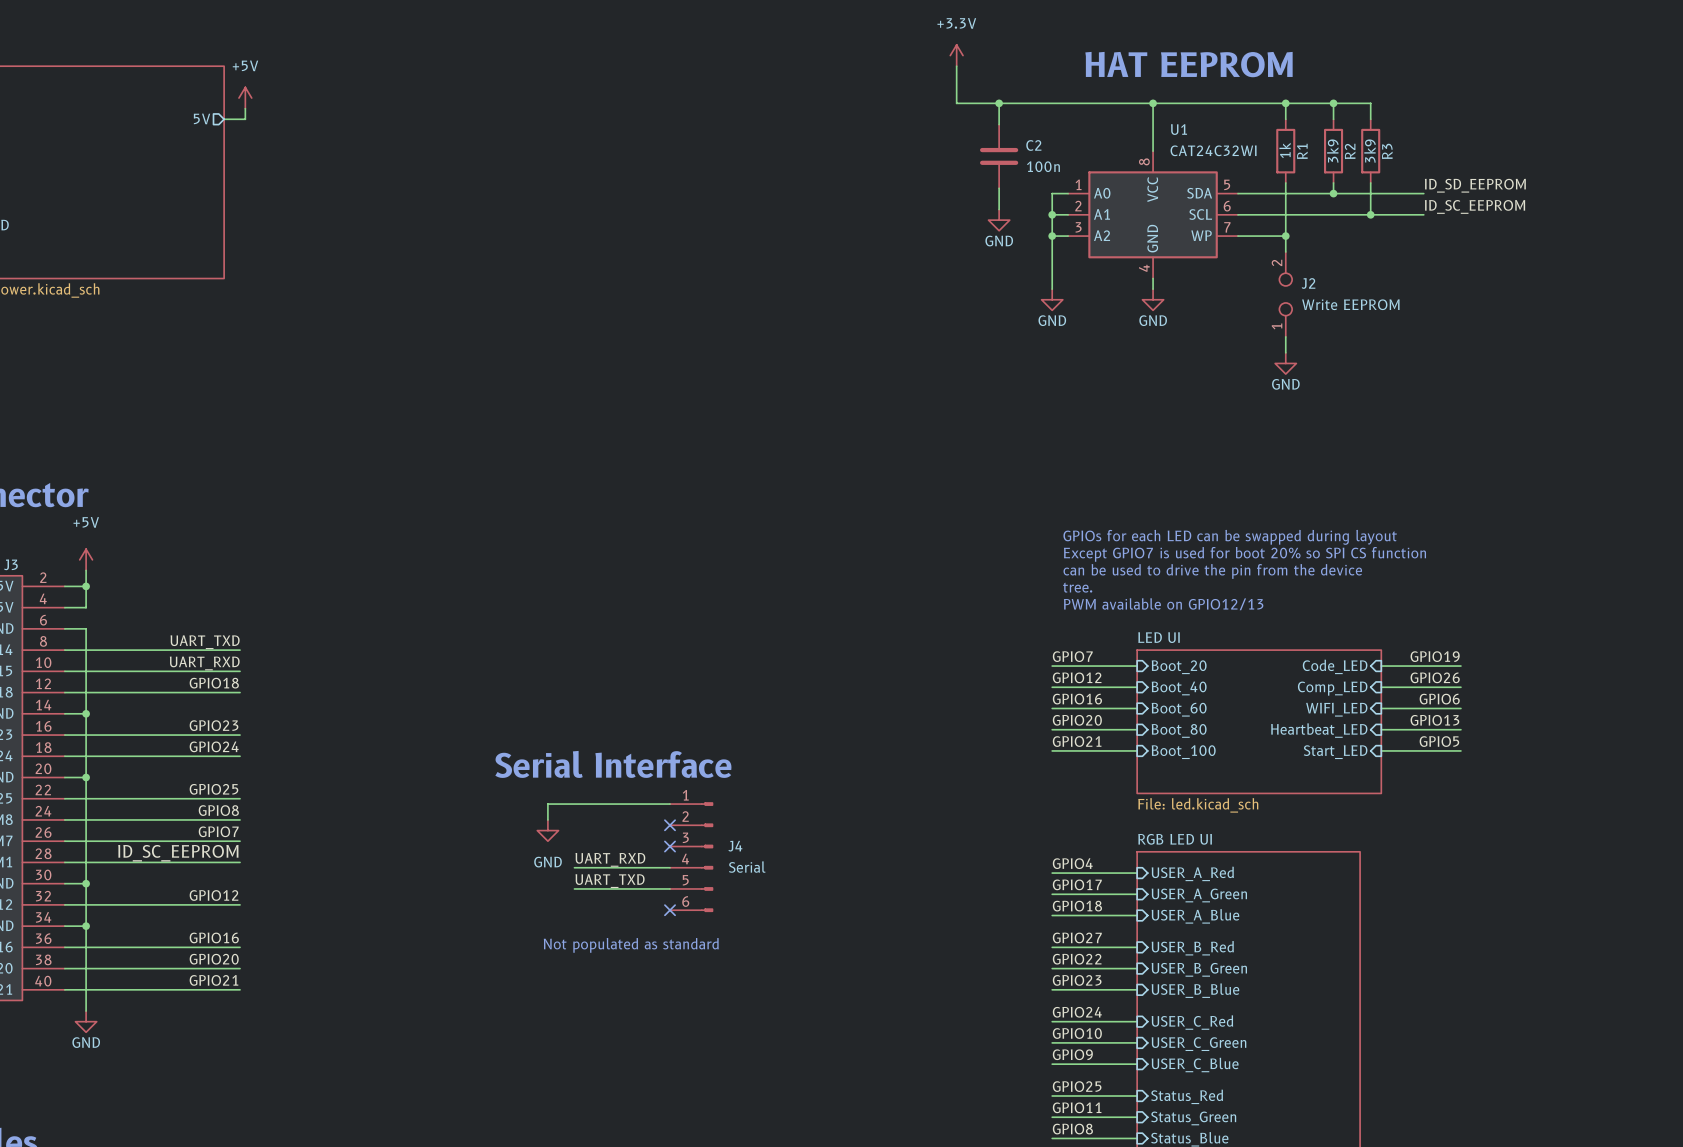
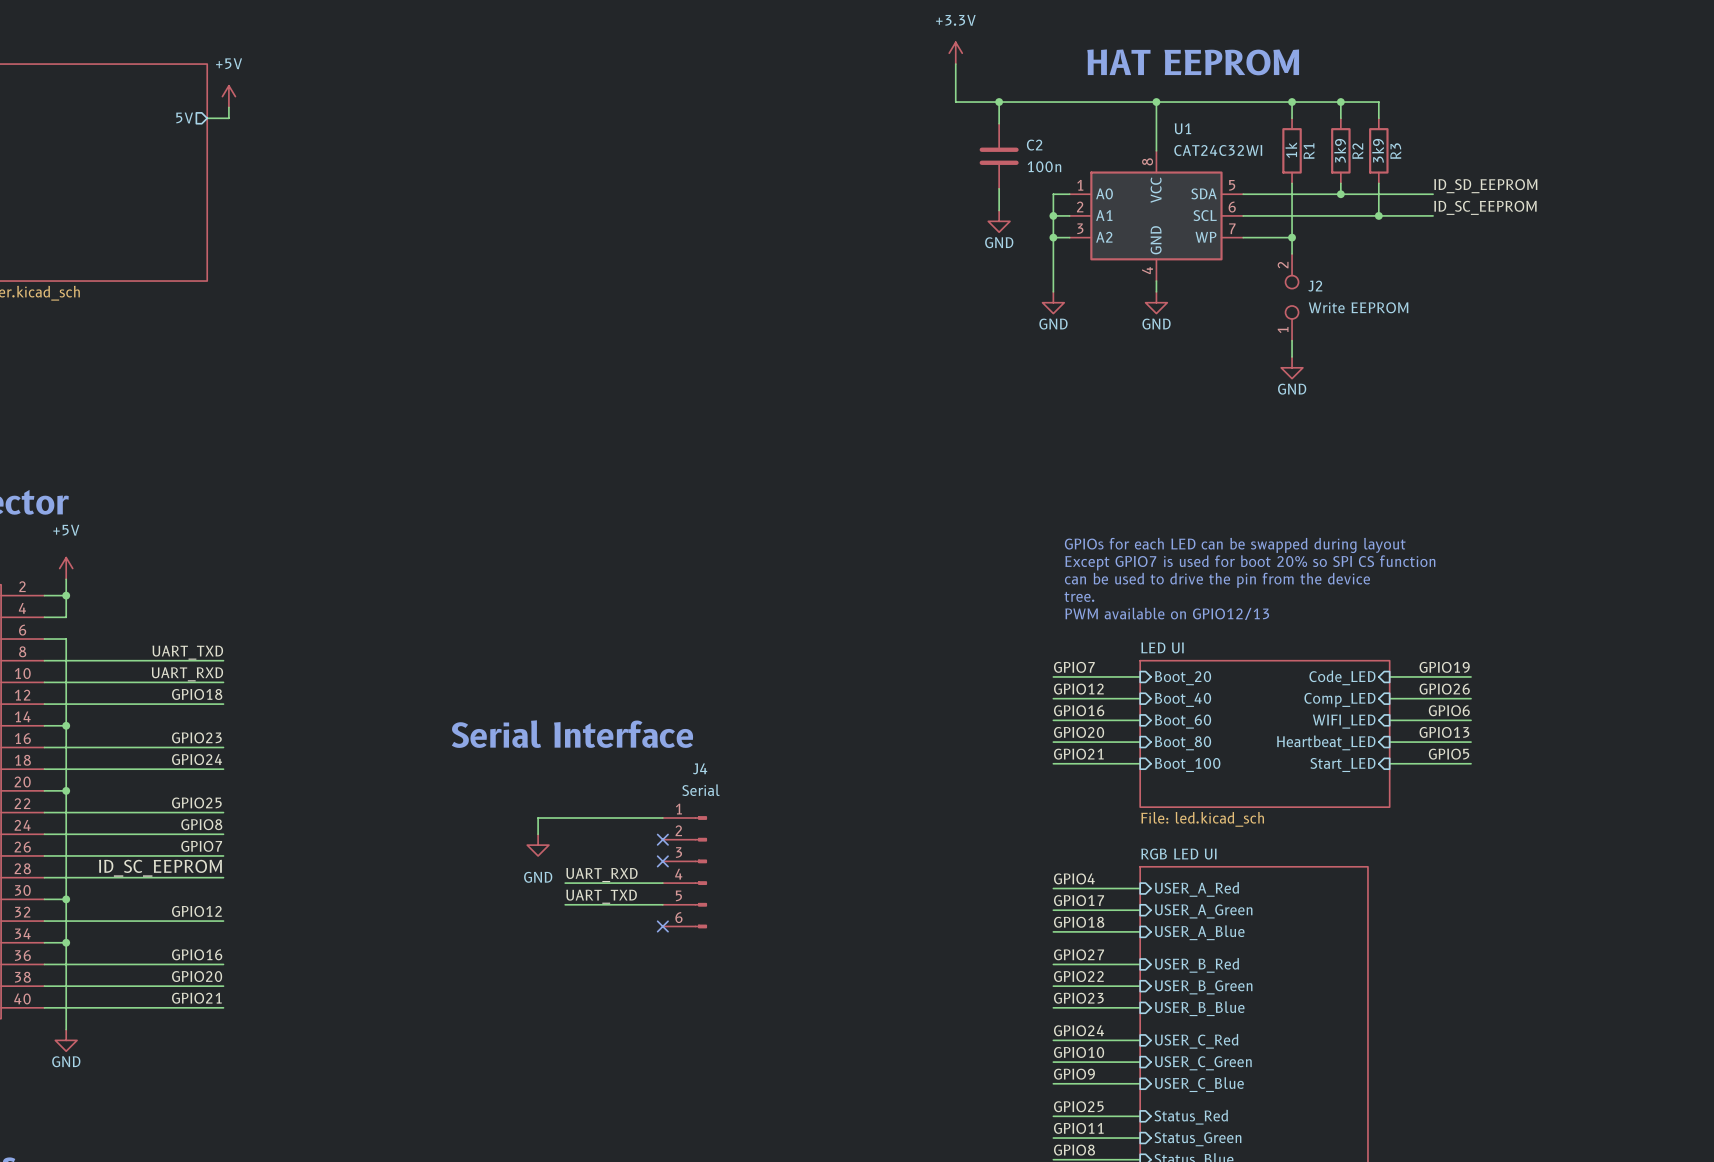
text position: Serial Interface (613, 764) -> Serial Interface (572, 734)
J4 name position: J4 (735, 846) -> J4 (700, 768)
J4 value position: Serial (747, 867) -> Serial (701, 790)
text: Not populated as standard (631, 945) -> none

